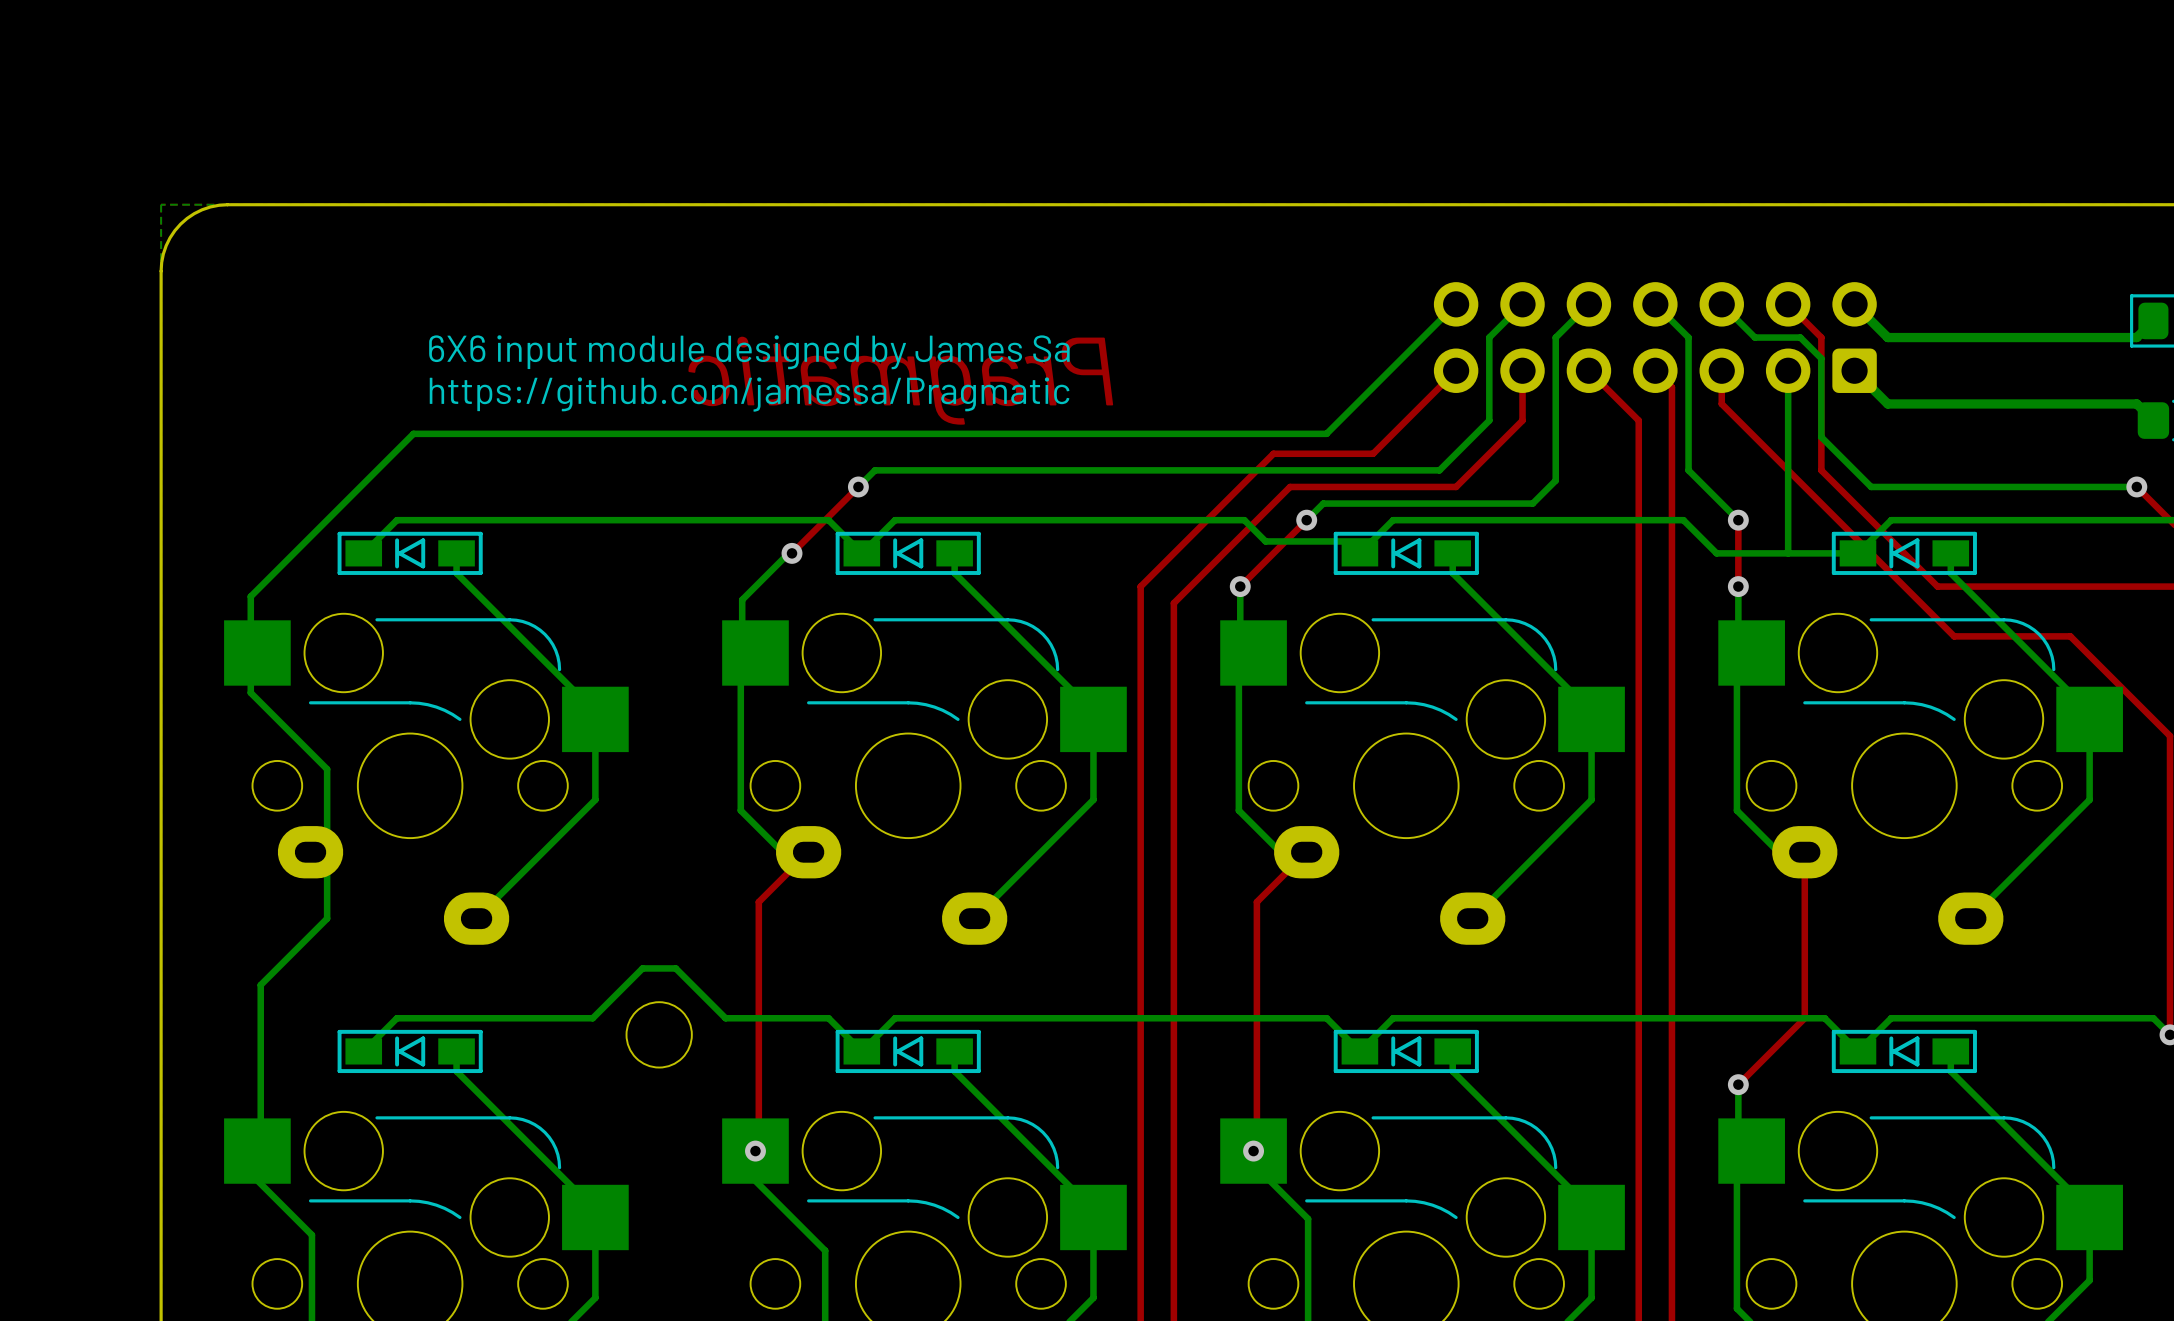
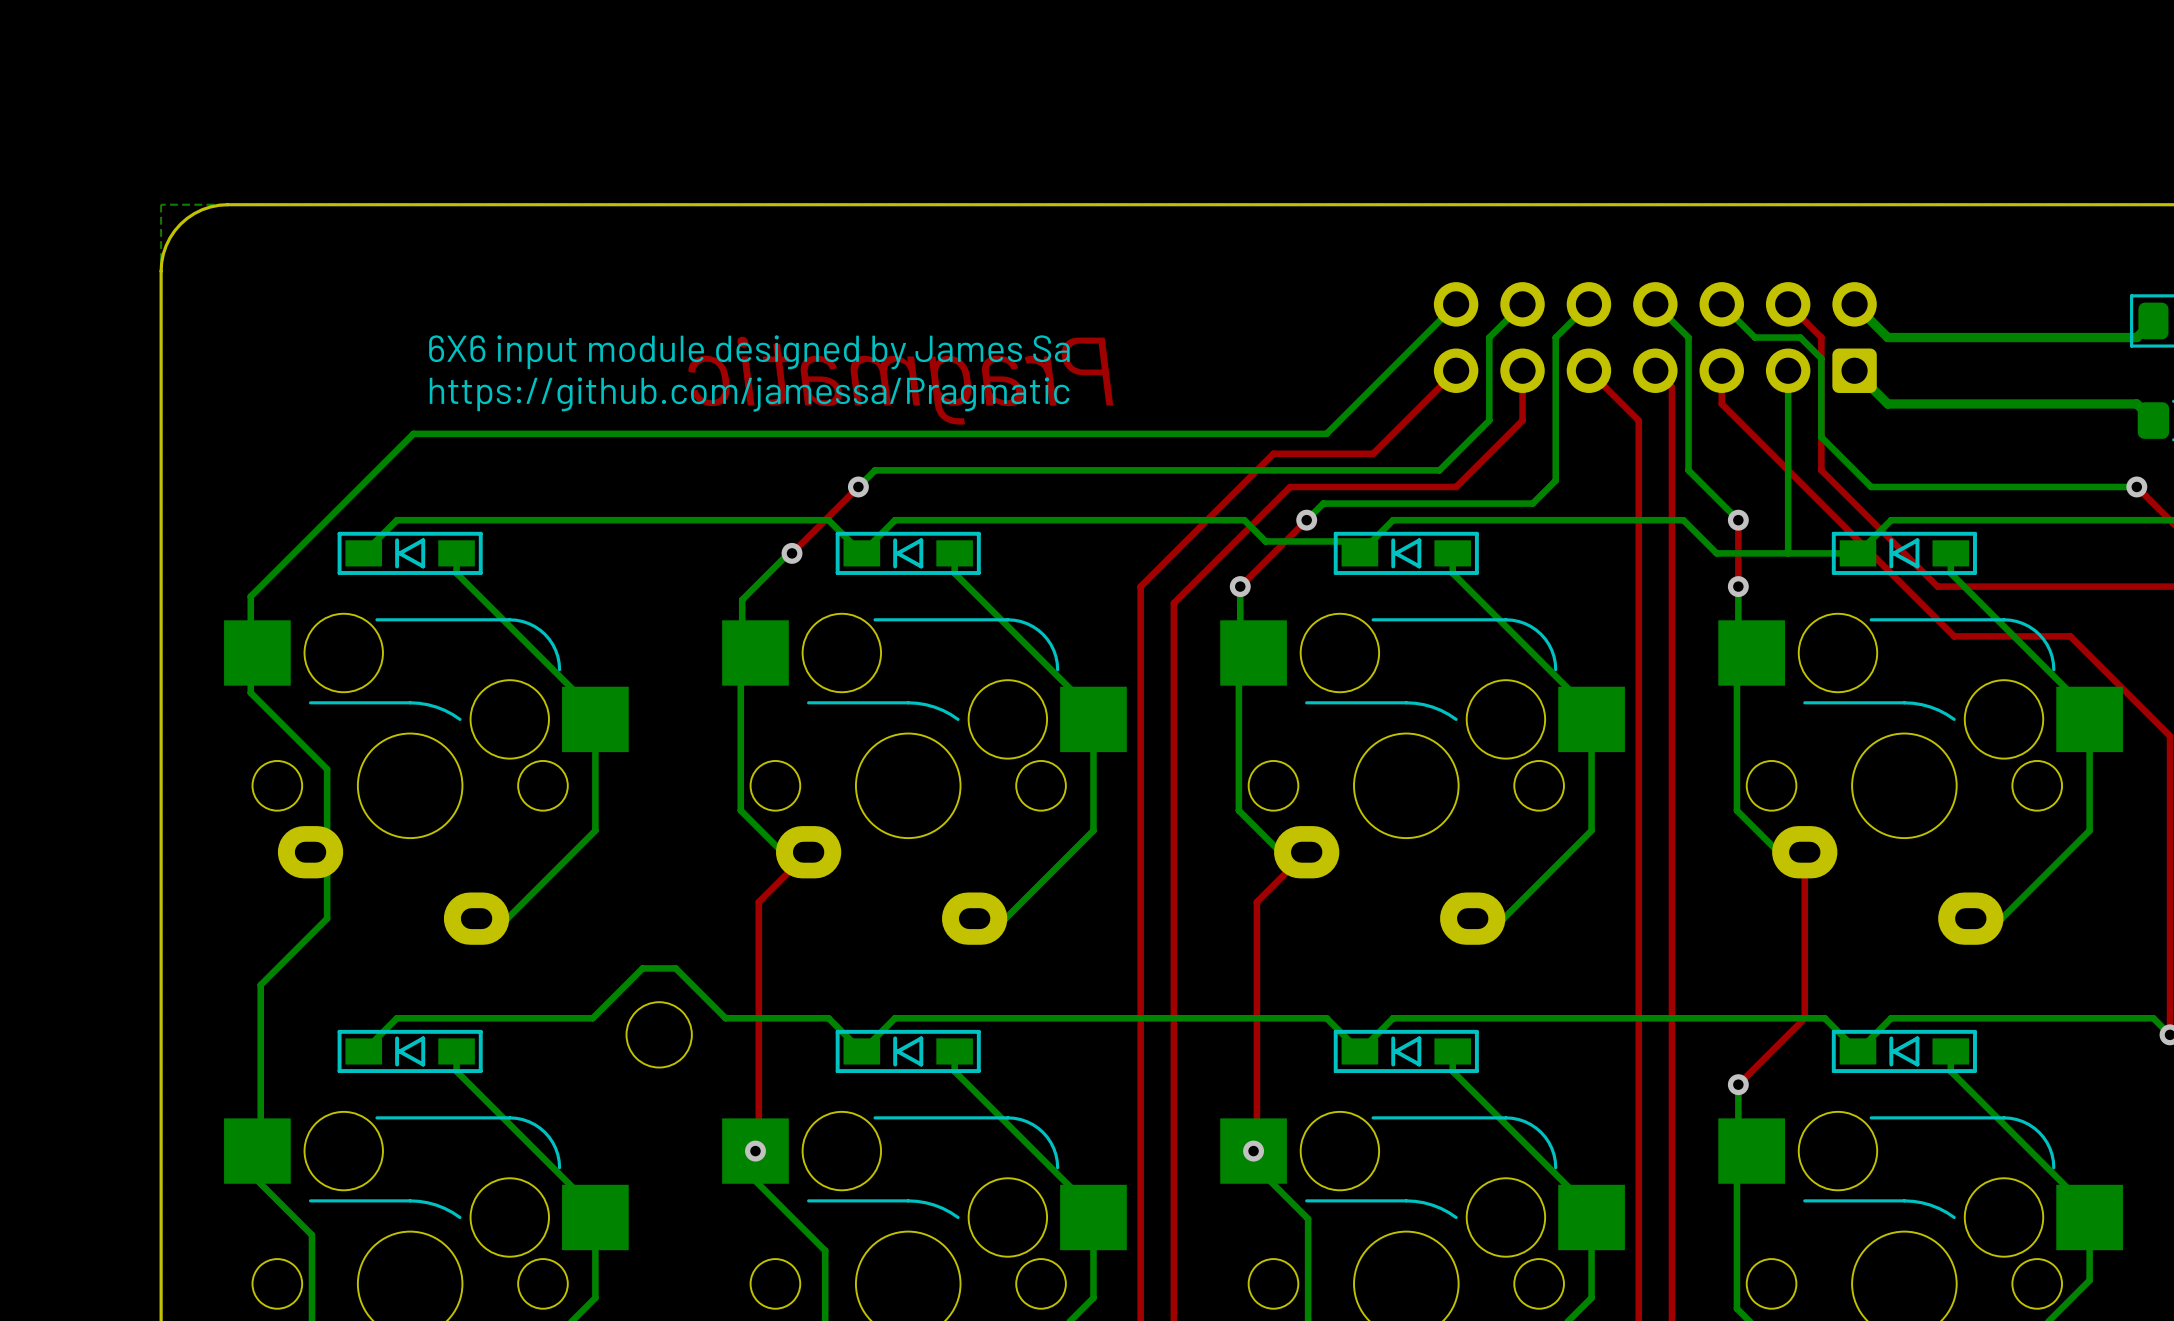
bottom track: (595, 799) (476, 918) -> (595, 799) (595, 830) (507, 918) (476, 918)
bottom track: (1093, 799) (974, 918) -> (1093, 799) (1093, 830) (1005, 918) (974, 918)
bottom track: (1591, 799) (1472, 918) -> (1591, 799) (1591, 830) (1503, 918) (1472, 918)
bottom track: (2089, 799) (1970, 918) -> (2089, 799) (2089, 830) (2001, 918) (1970, 918)

